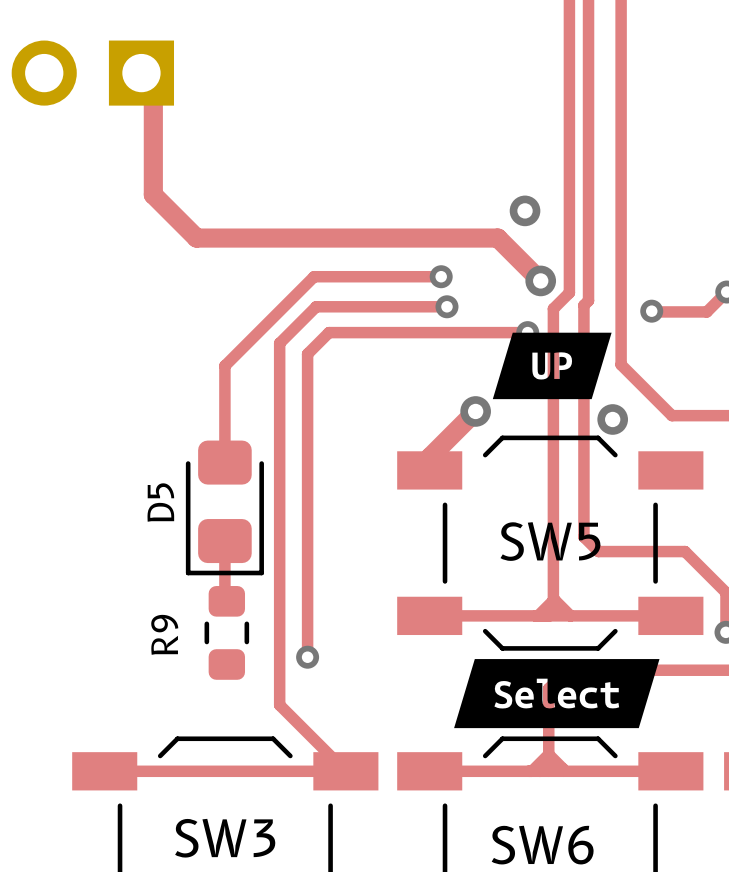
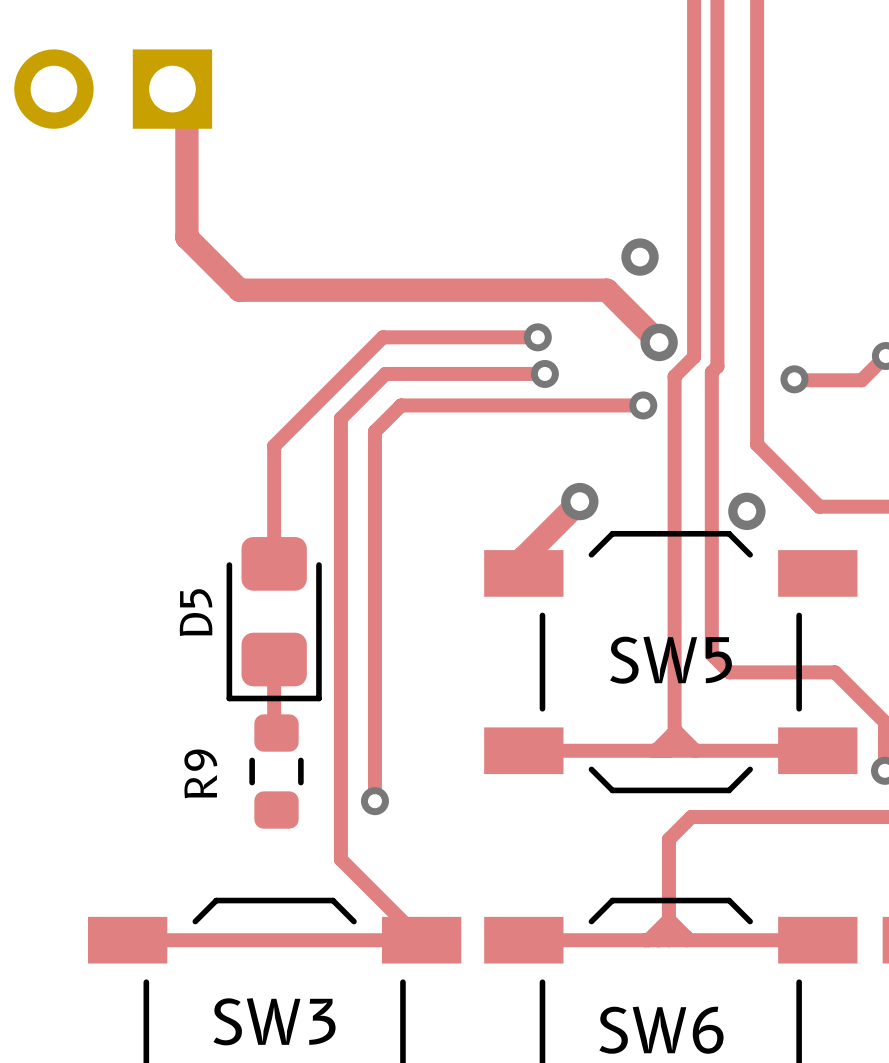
drawing: [492, 332, 612, 400] -> none
drawing: [454, 659, 660, 729] -> none

